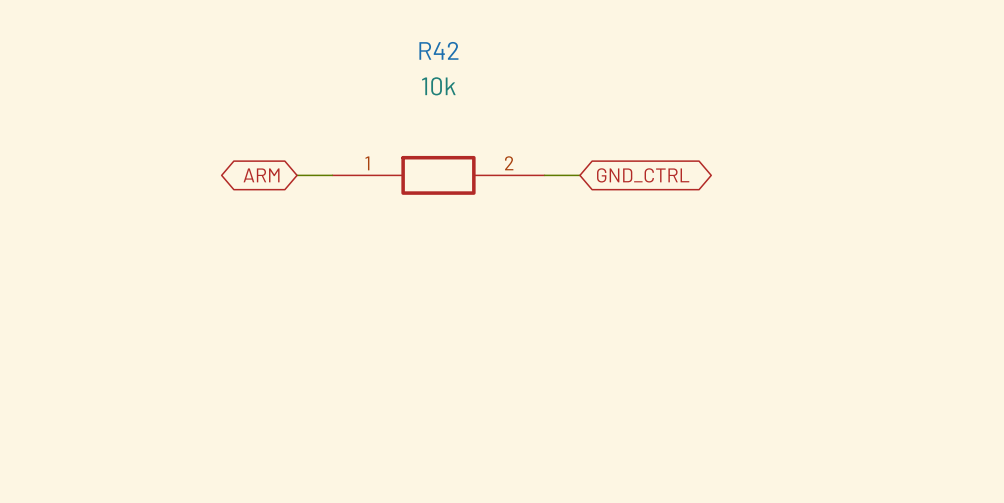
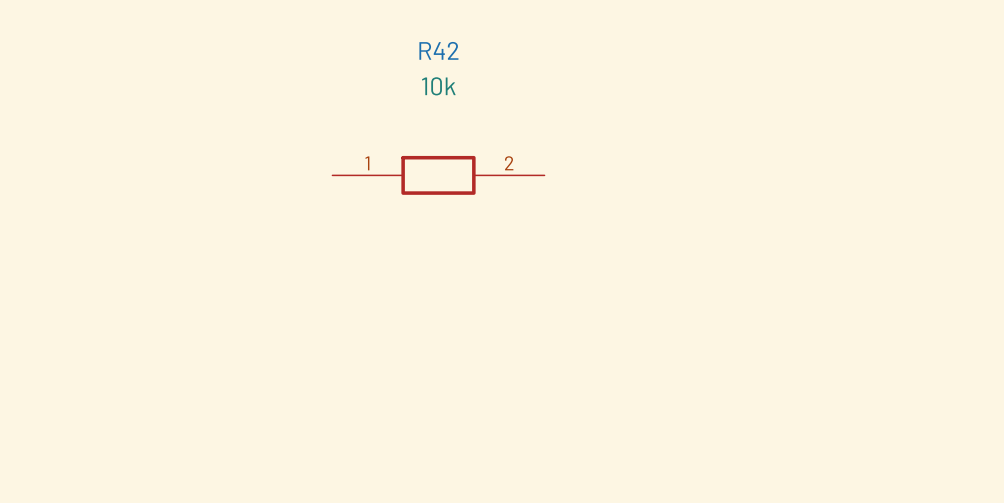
global label: ARM (261, 175) -> none
wire: (297, 175) (332, 175) -> none
wire: (544, 175) (579, 175) -> none
global label: GND_CTRL (643, 175) -> none

